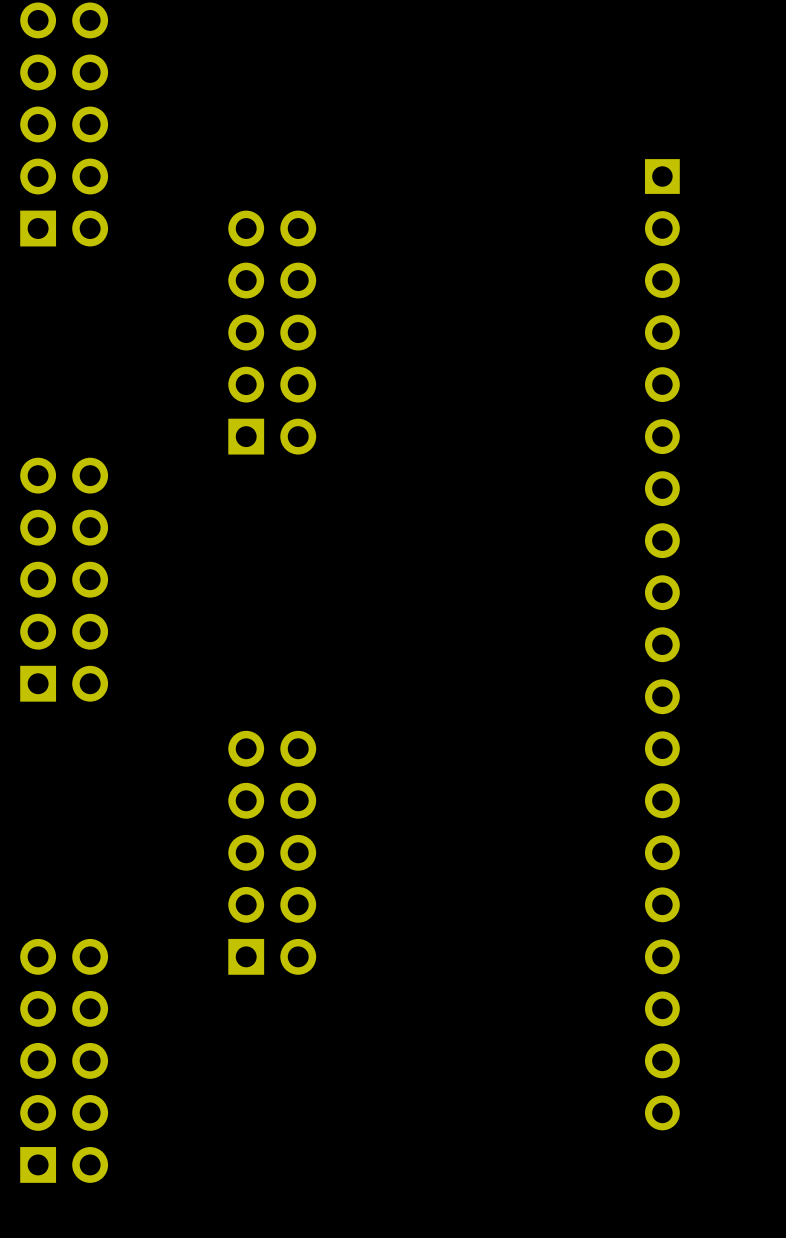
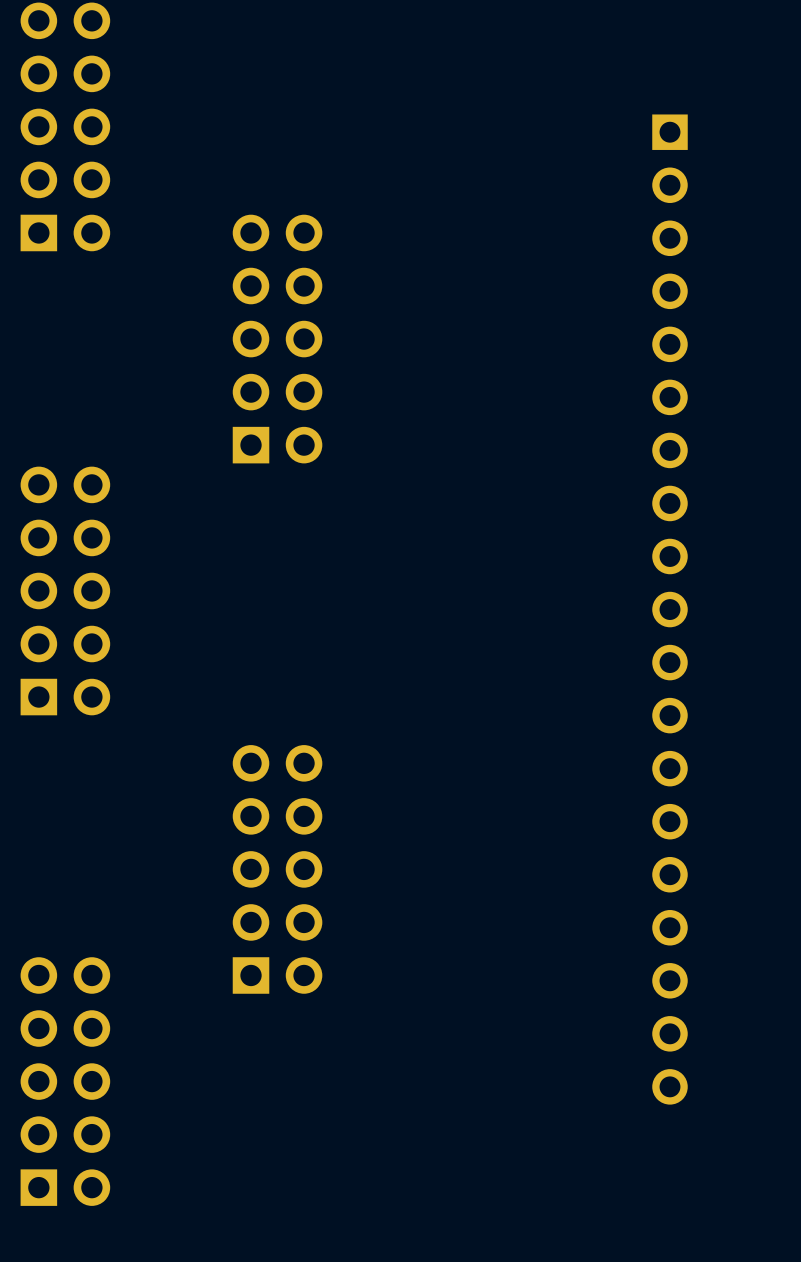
part position: (662, 644) -> (669, 609)

